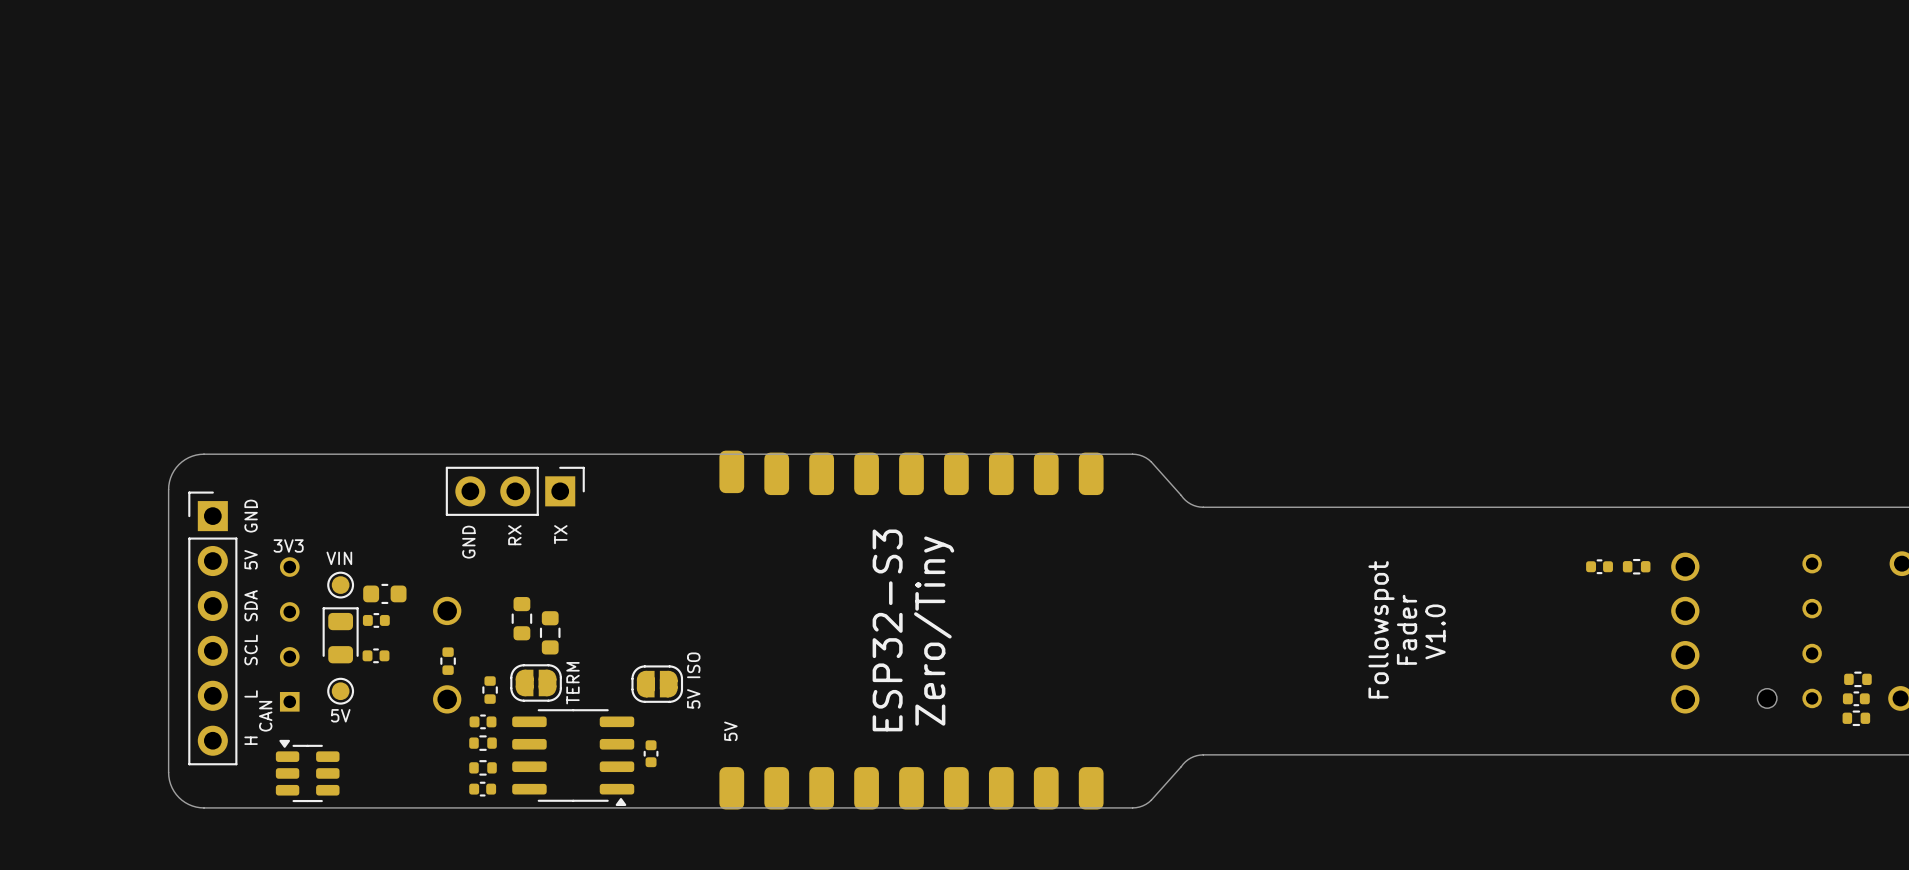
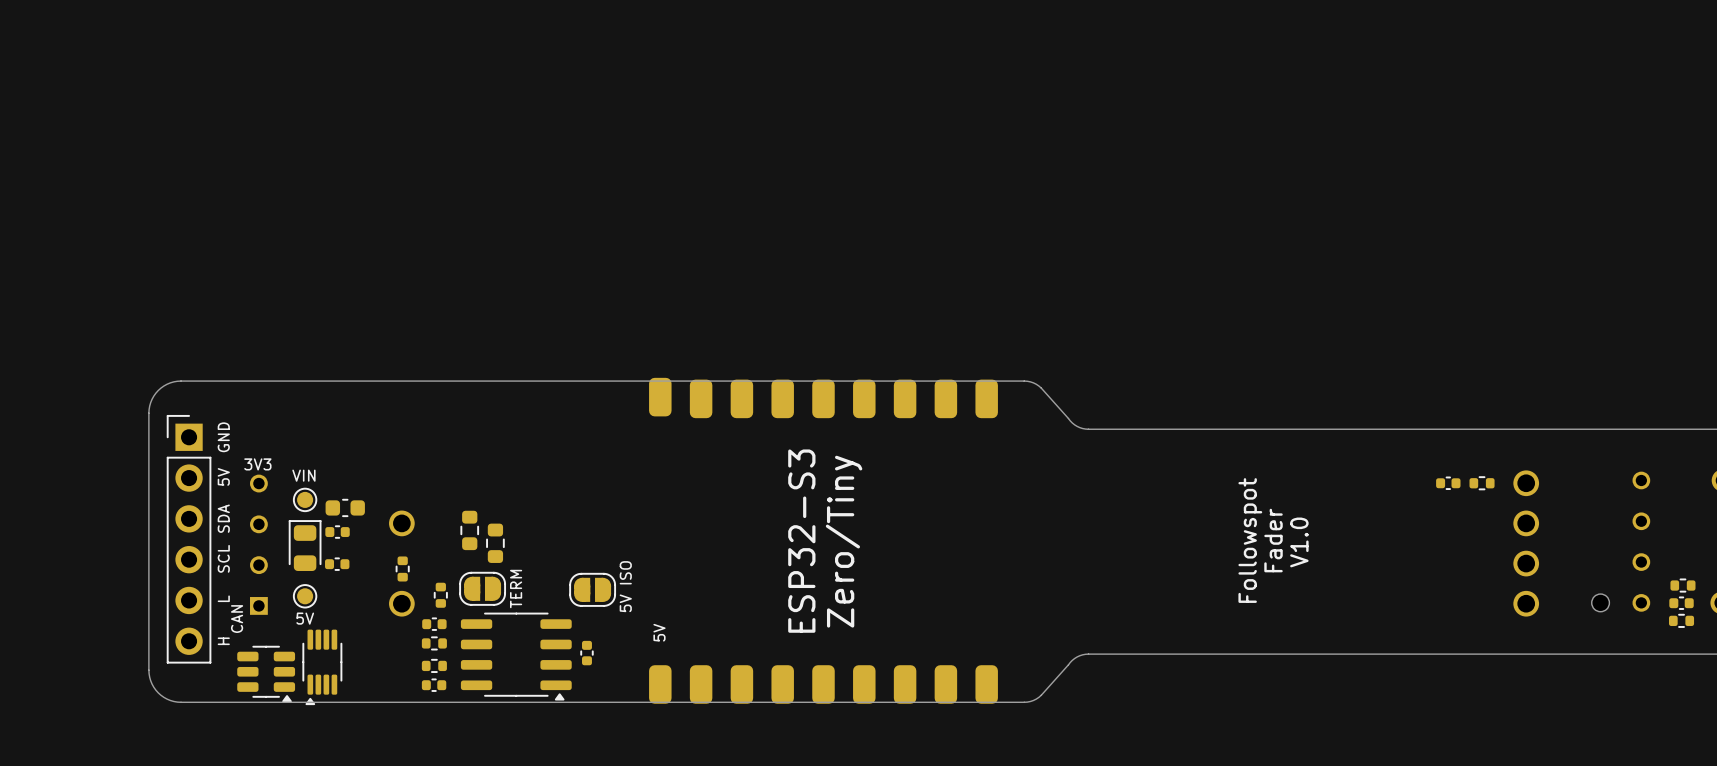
part: (515, 491) -> none
text: TX (560, 534) -> none
text: RX (514, 535) -> none
text: GND (468, 542) -> none
part: none -> (322, 667)
part rotation: 0° (307, 770) -> 180° (266, 674)

